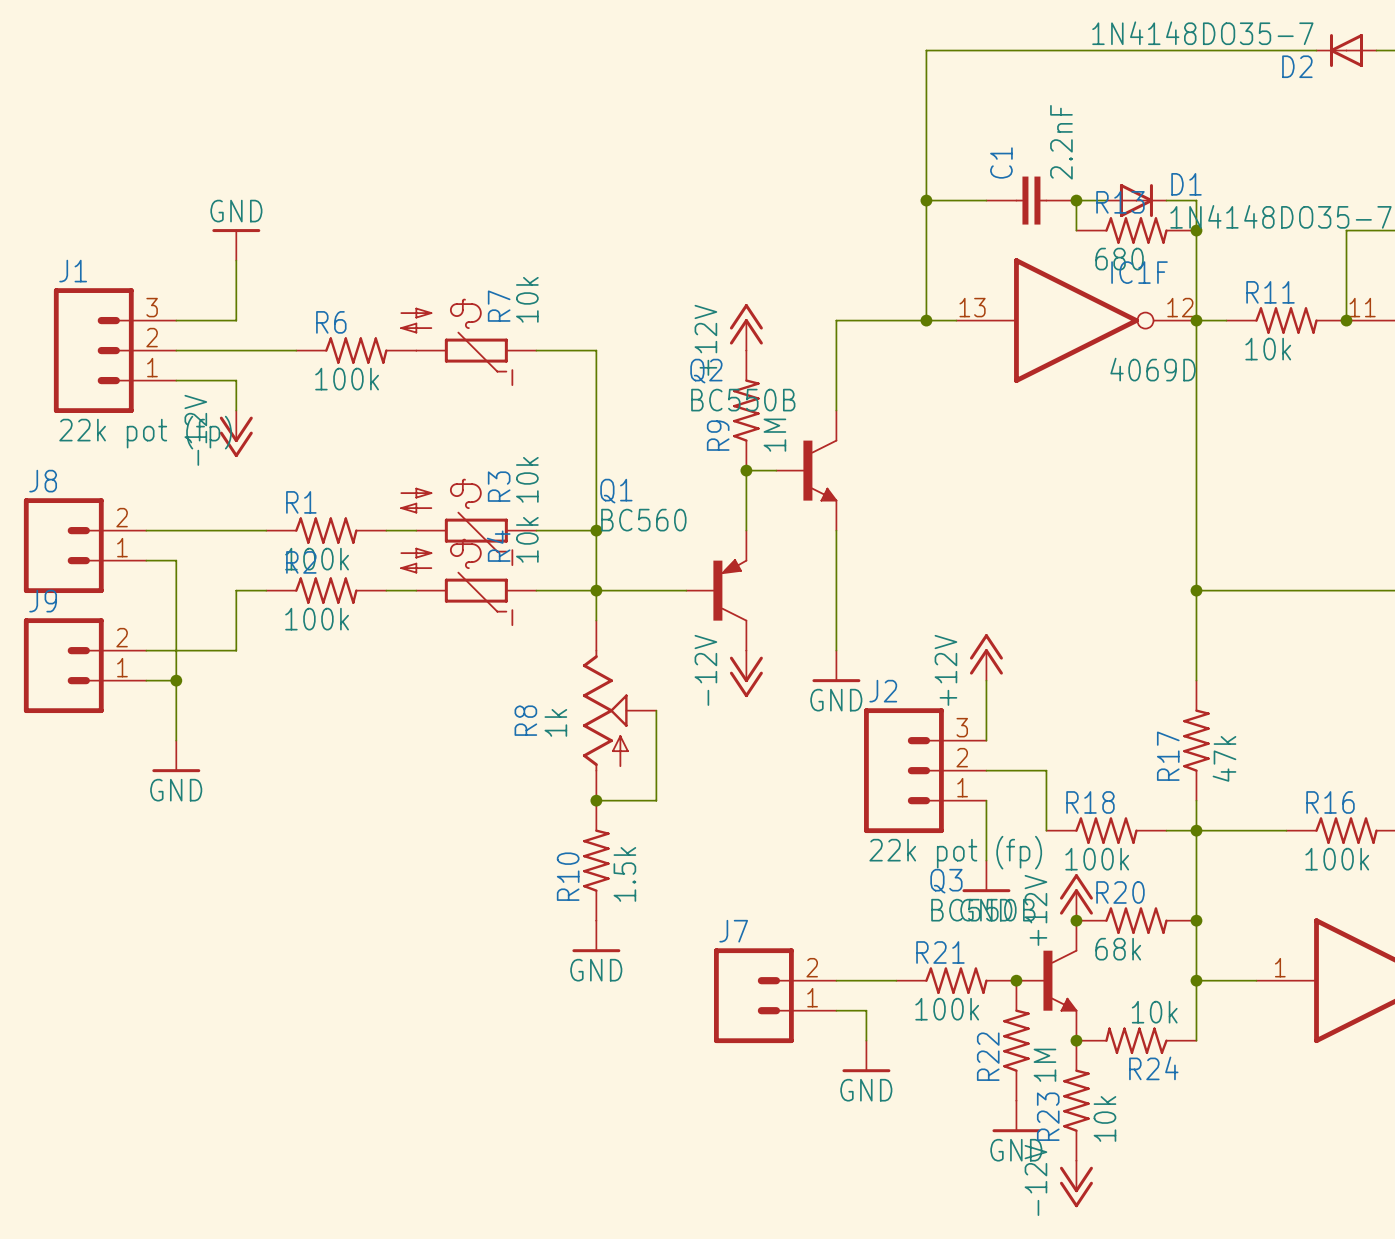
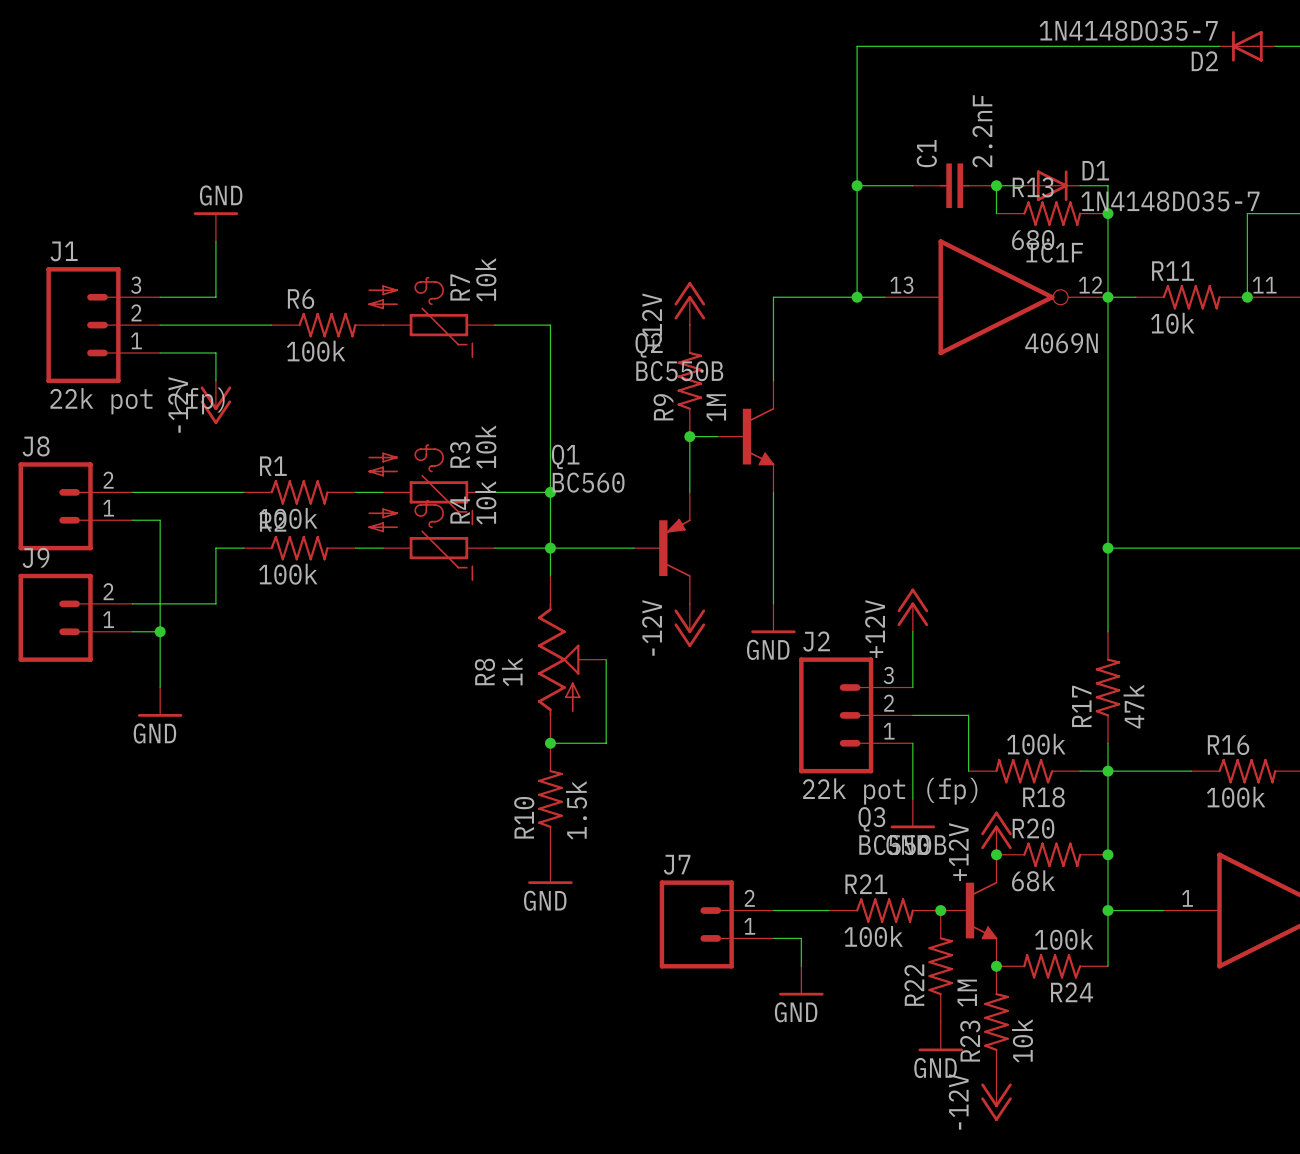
IC1F value: 4069D (1153, 369) -> 4069N (1061, 343)
R18 rotation: 0° (1106, 830) -> 180° (1024, 771)
R24 value: 10k (1154, 1012) -> 100k (1064, 939)

